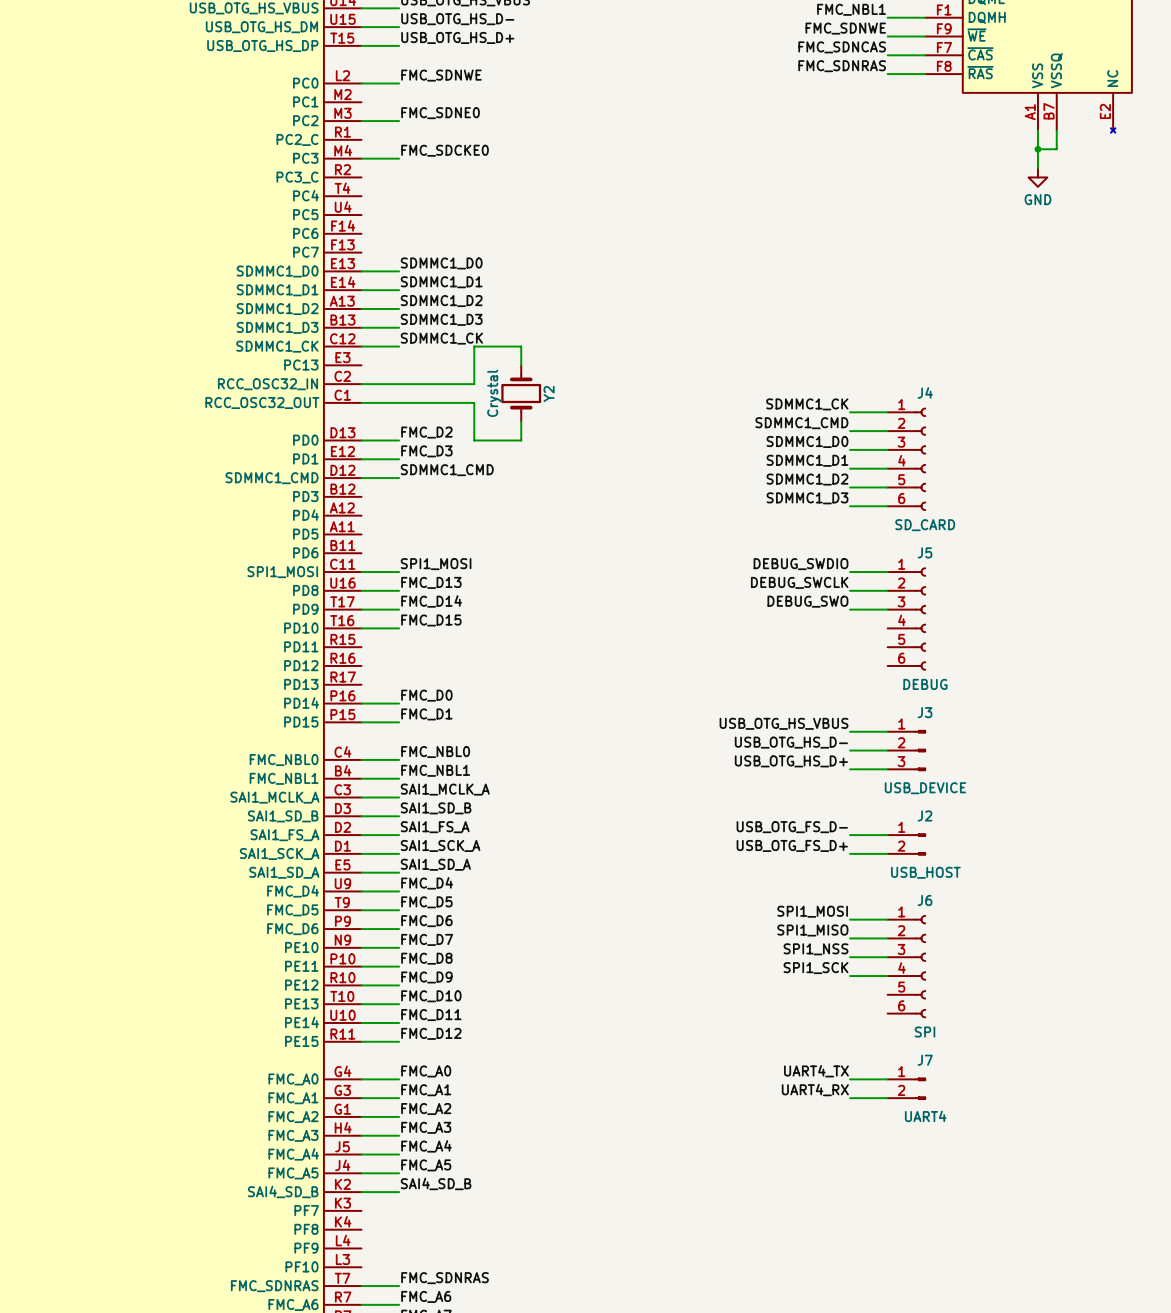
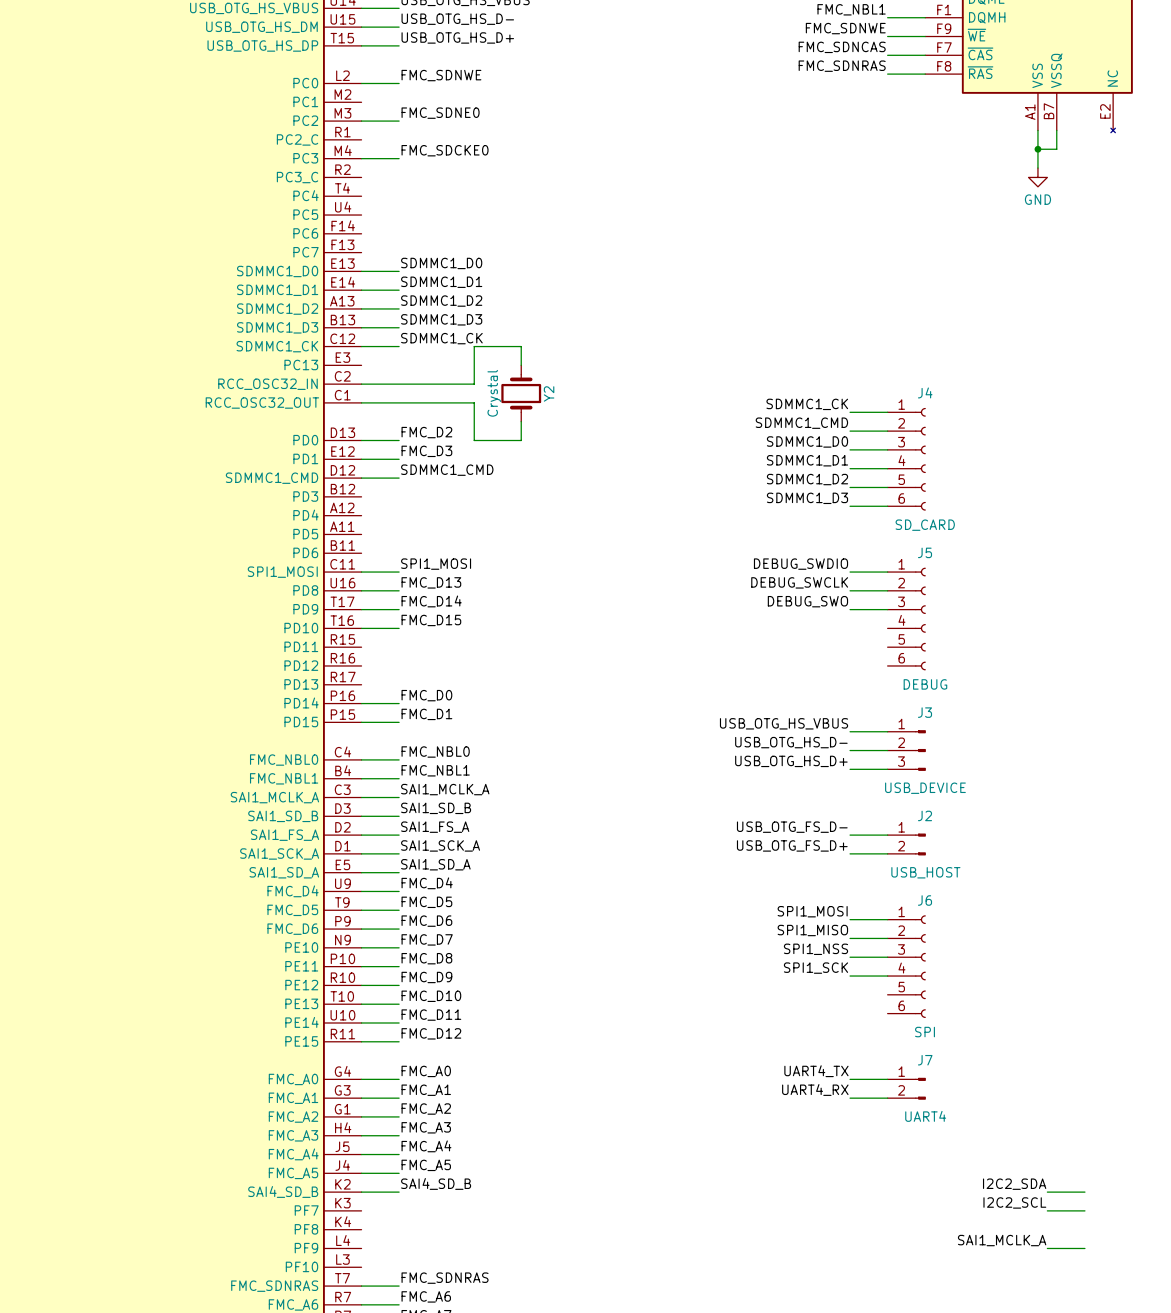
label: none -> I2C2_SDA (1014, 1184)
wire: none -> (1047, 1192) (1084, 1192)
label: none -> I2C2_SCL (1014, 1202)
wire: none -> (1047, 1210) (1084, 1210)
label: none -> SAI1_MCLK_A (1002, 1240)
wire: none -> (1047, 1248) (1084, 1248)

